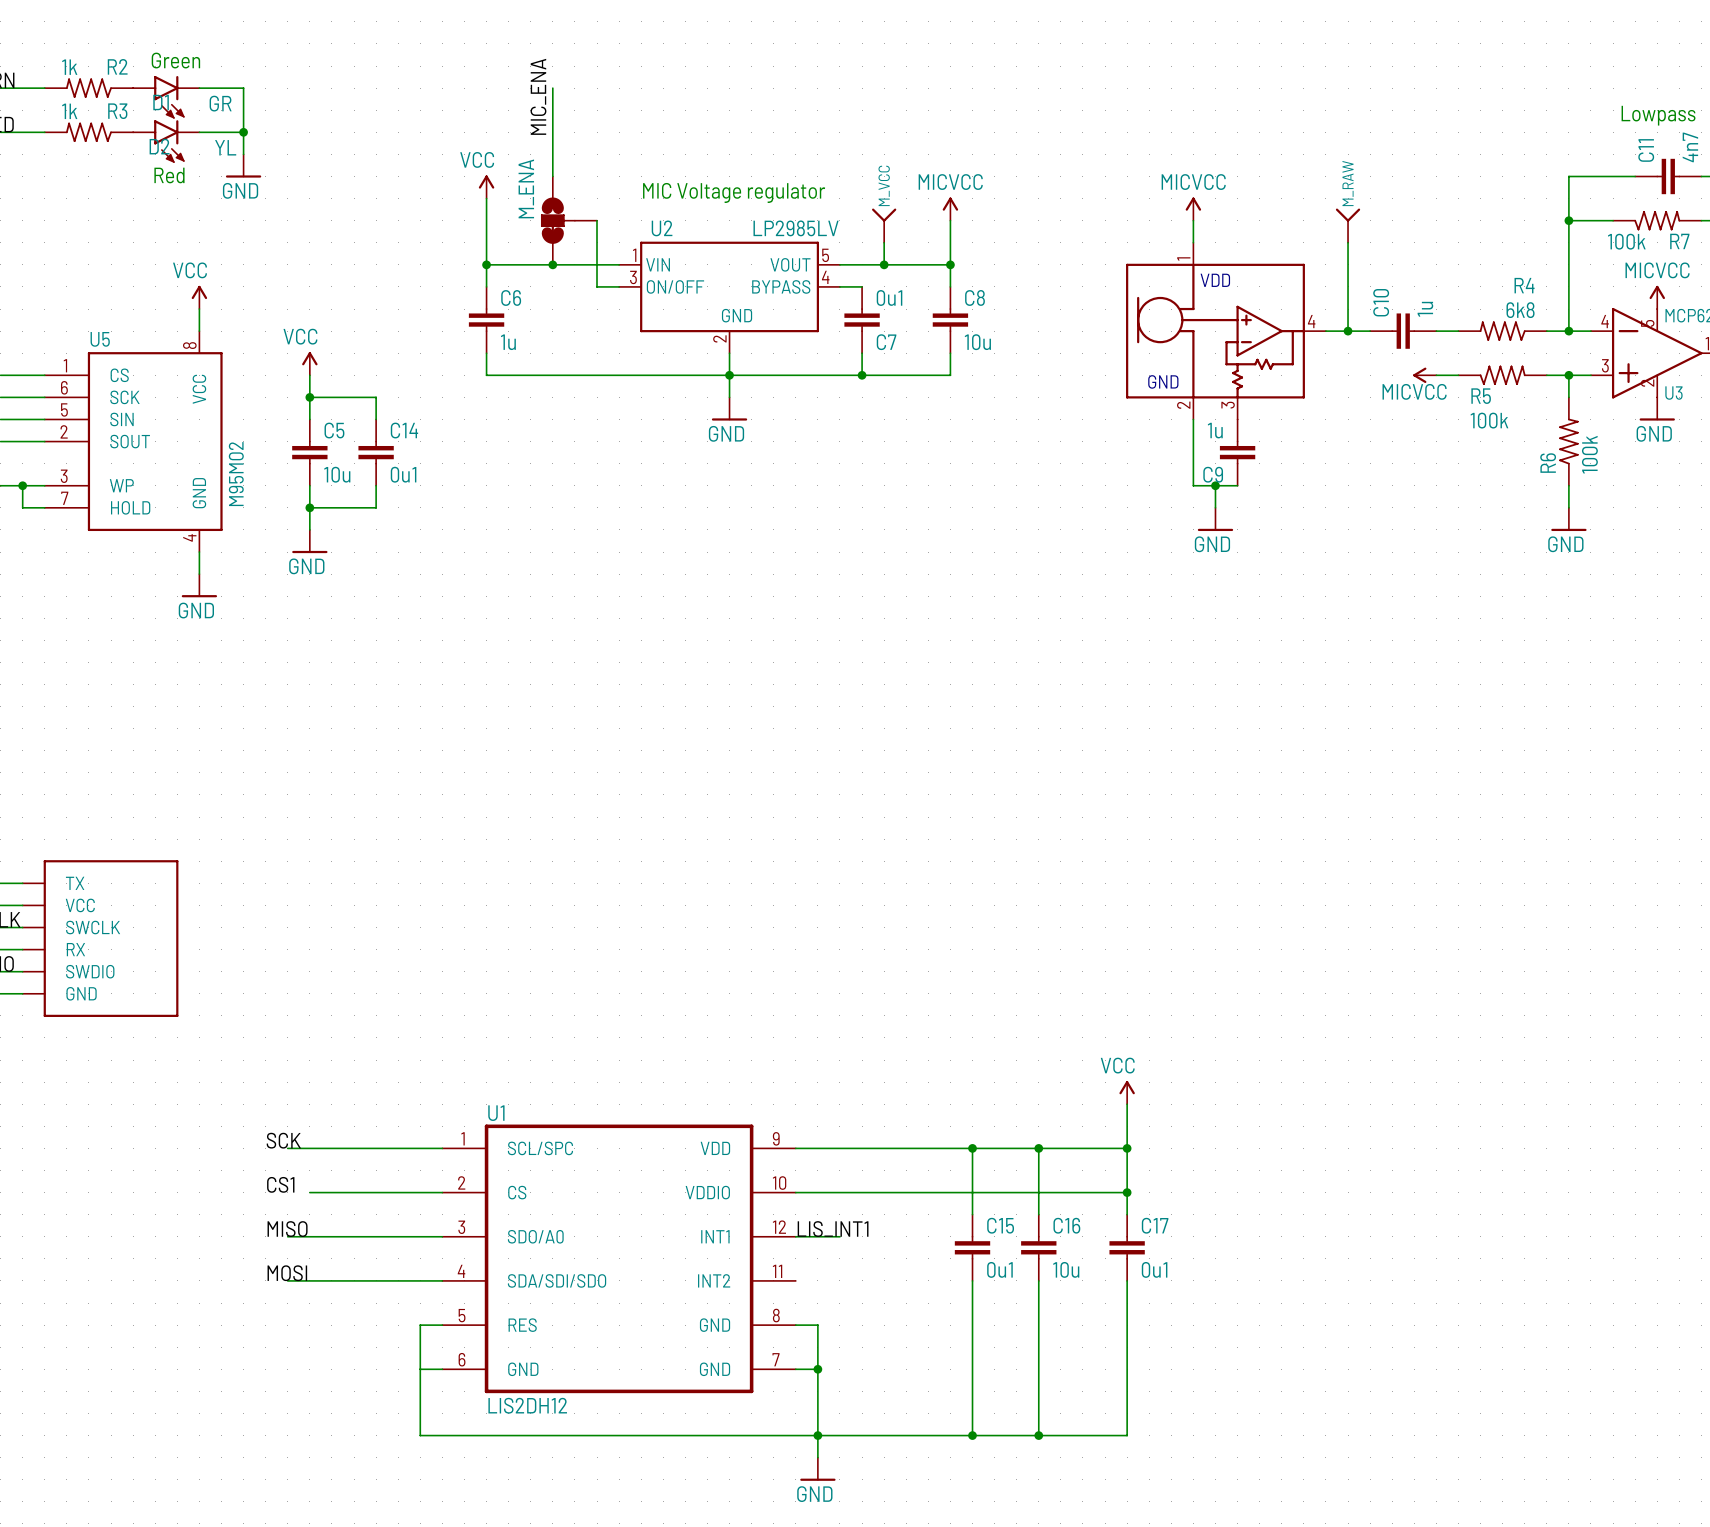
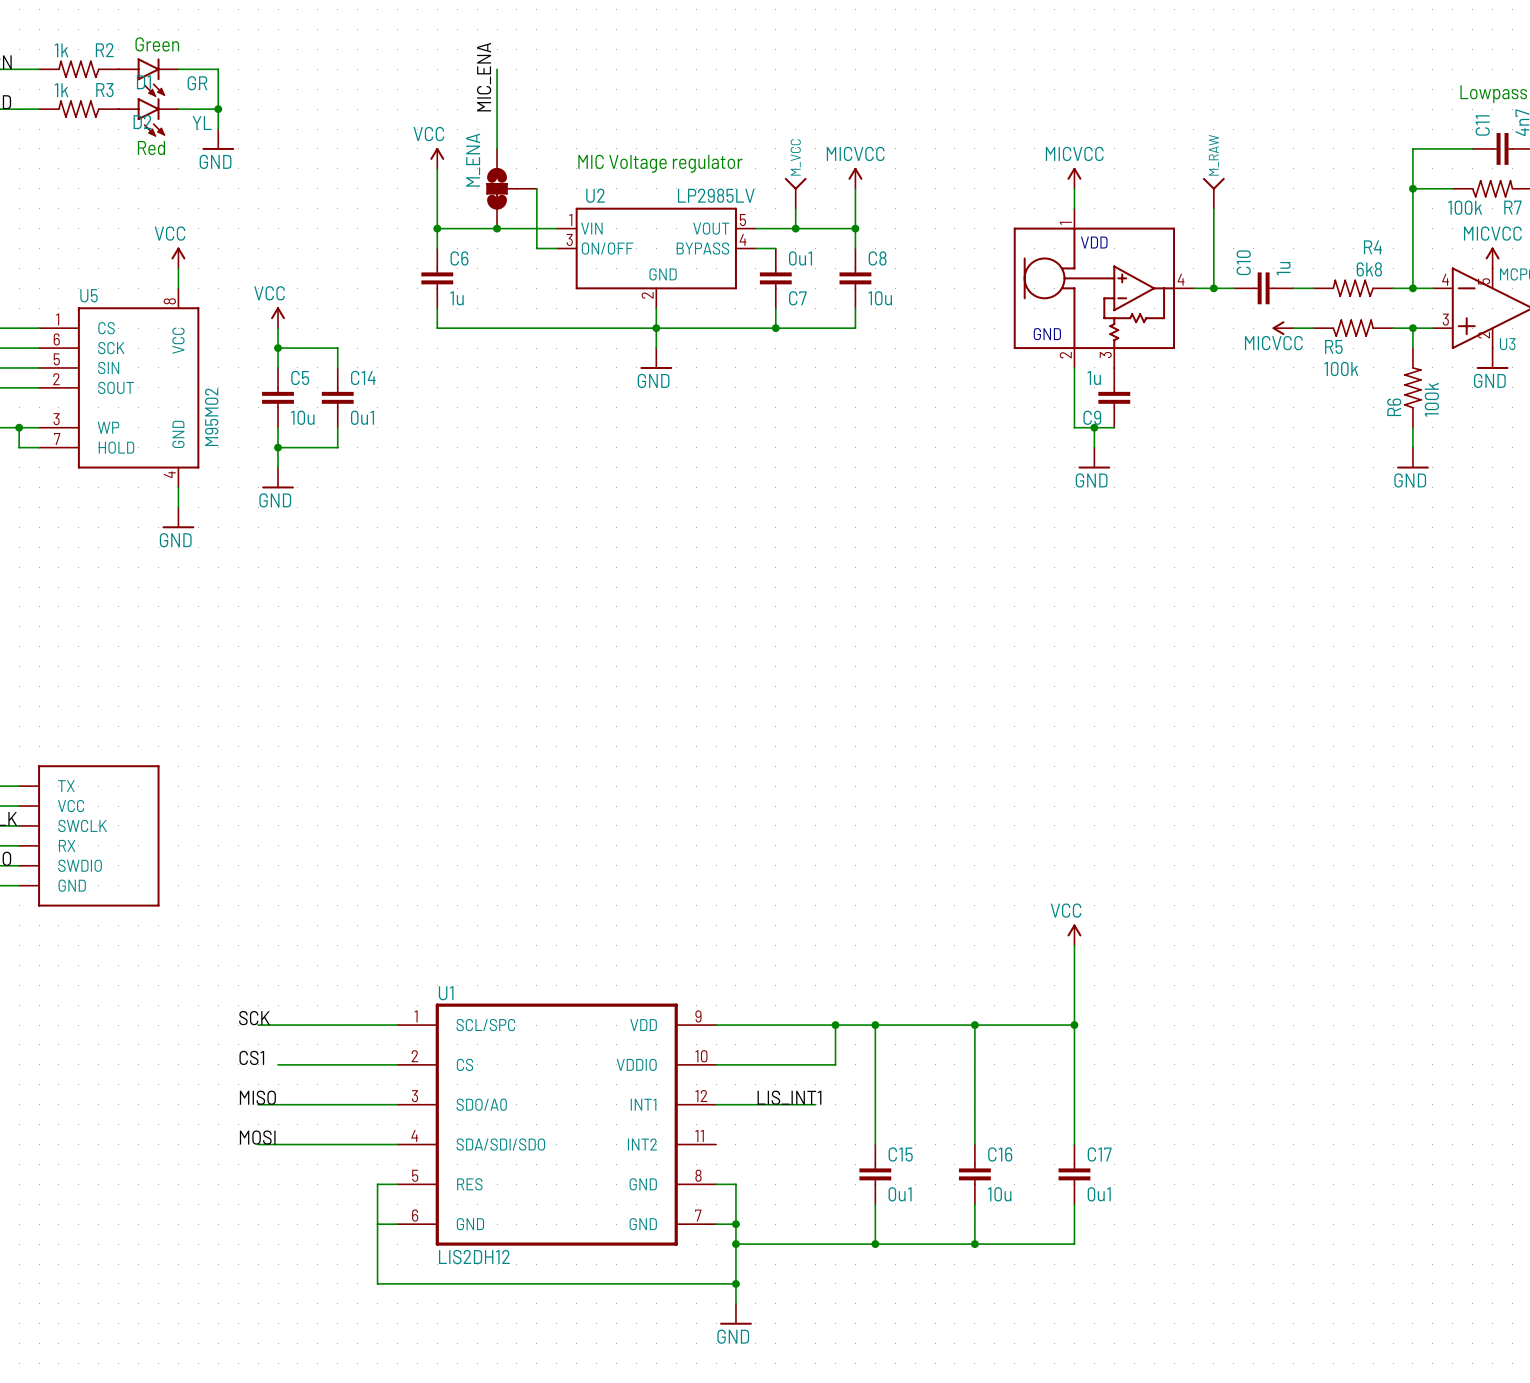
wire: none -> (1074, 945) (1074, 1144)
power symbol position: VCC (1127, 1092) -> VCC (1074, 934)
wire: (1127, 1104) (1127, 1214) -> none
junction: none -> (835, 1025)
wire: (1038, 1148) (1038, 1214) -> none
junction: (1038, 1148) -> none
wire: none -> (974, 1025) (974, 1144)
junction: none -> (974, 1025)
wire: none -> (1014, 1025) (1074, 1025)
junction: (1127, 1148) -> none
junction: none -> (1074, 1025)
wire: (928, 1192) (1127, 1192) -> (835, 1064) (835, 1025)
junction: (1127, 1192) -> none
label position: LIS_INT1 (833, 1229) -> LIS_INT1 (789, 1097)
wire: none -> (755, 1104) (815, 1104)
C15 position: (972, 1247) -> (875, 1174)
C16 position: (1038, 1247) -> (974, 1174)
C17 position: (1127, 1247) -> (1074, 1174)
wire: (1038, 1280) (1038, 1435) -> none
wire: (1127, 1280) (1127, 1435) (817, 1435) -> none
wire: none -> (1074, 1204) (1074, 1244) (735, 1244)
junction: none -> (735, 1244)
wire: (972, 1391) (972, 1435) -> (974, 1204) (974, 1244)
junction: none -> (875, 1244)
junction: none -> (974, 1244)
junction: (972, 1435) -> none
junction: (1038, 1435) -> none

